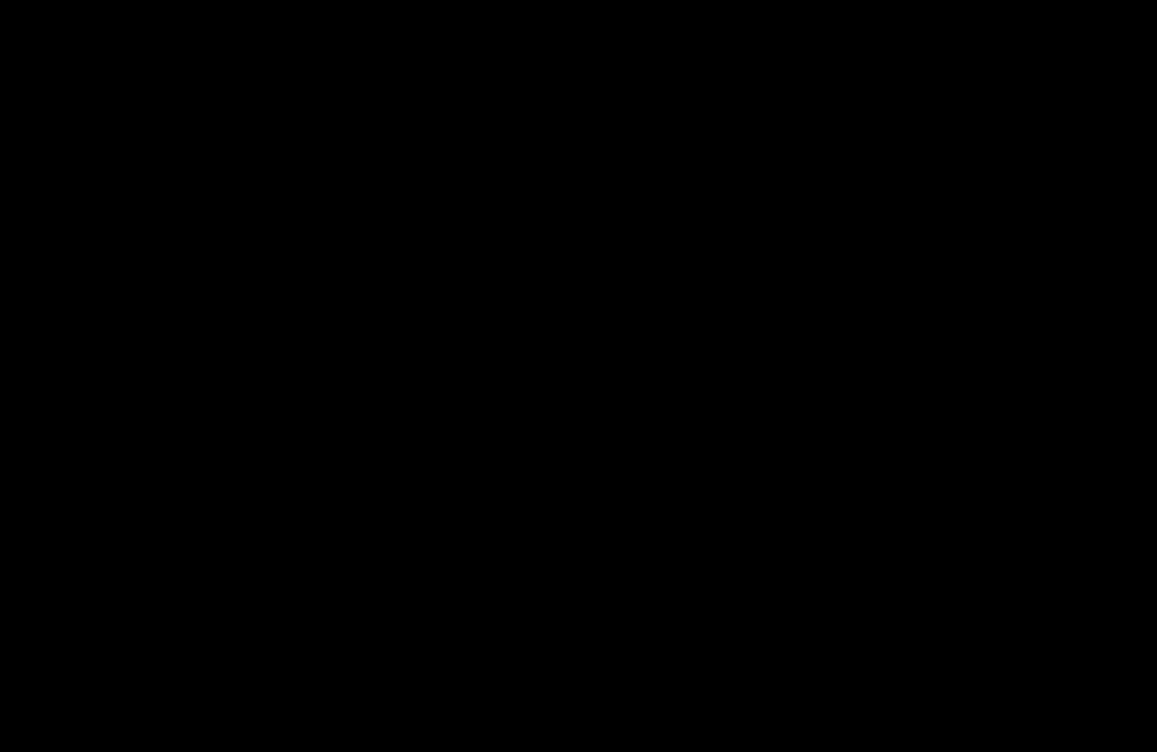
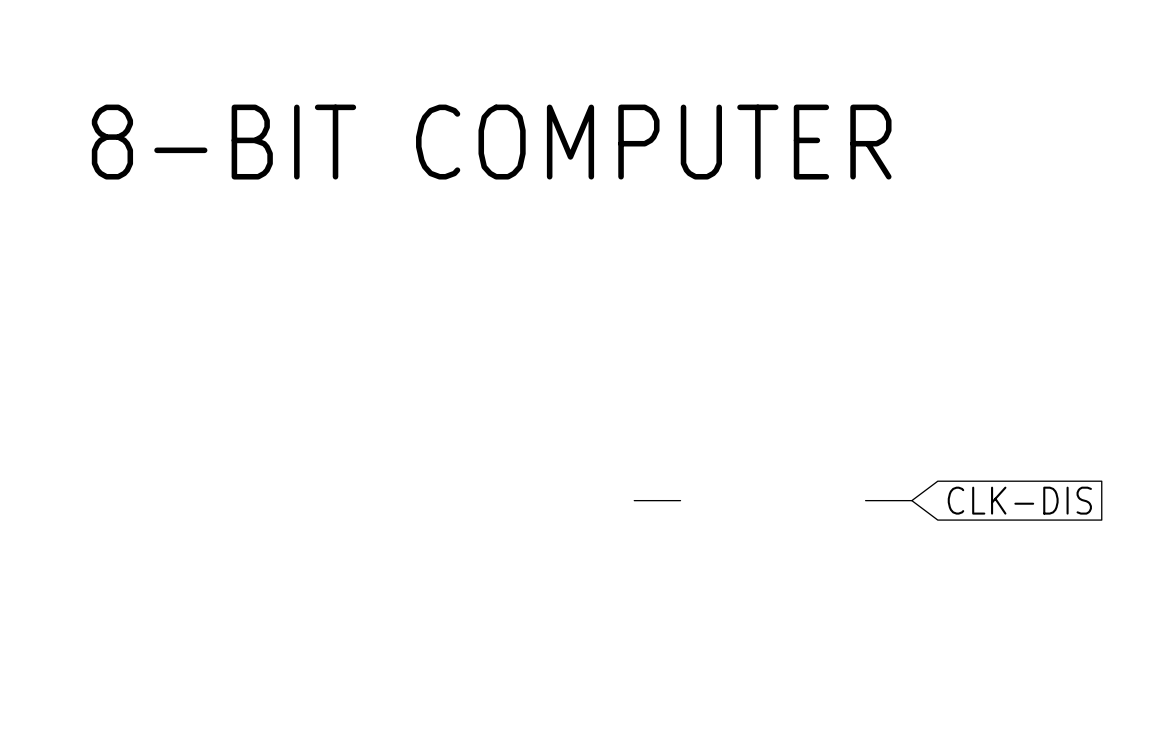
text: none -> 8-BIT COMPUTER (491, 142)
wire: none -> (634, 500) (680, 500)
wire: none -> (865, 500) (911, 500)
global label: none -> CLK-DIS (1019, 500)

